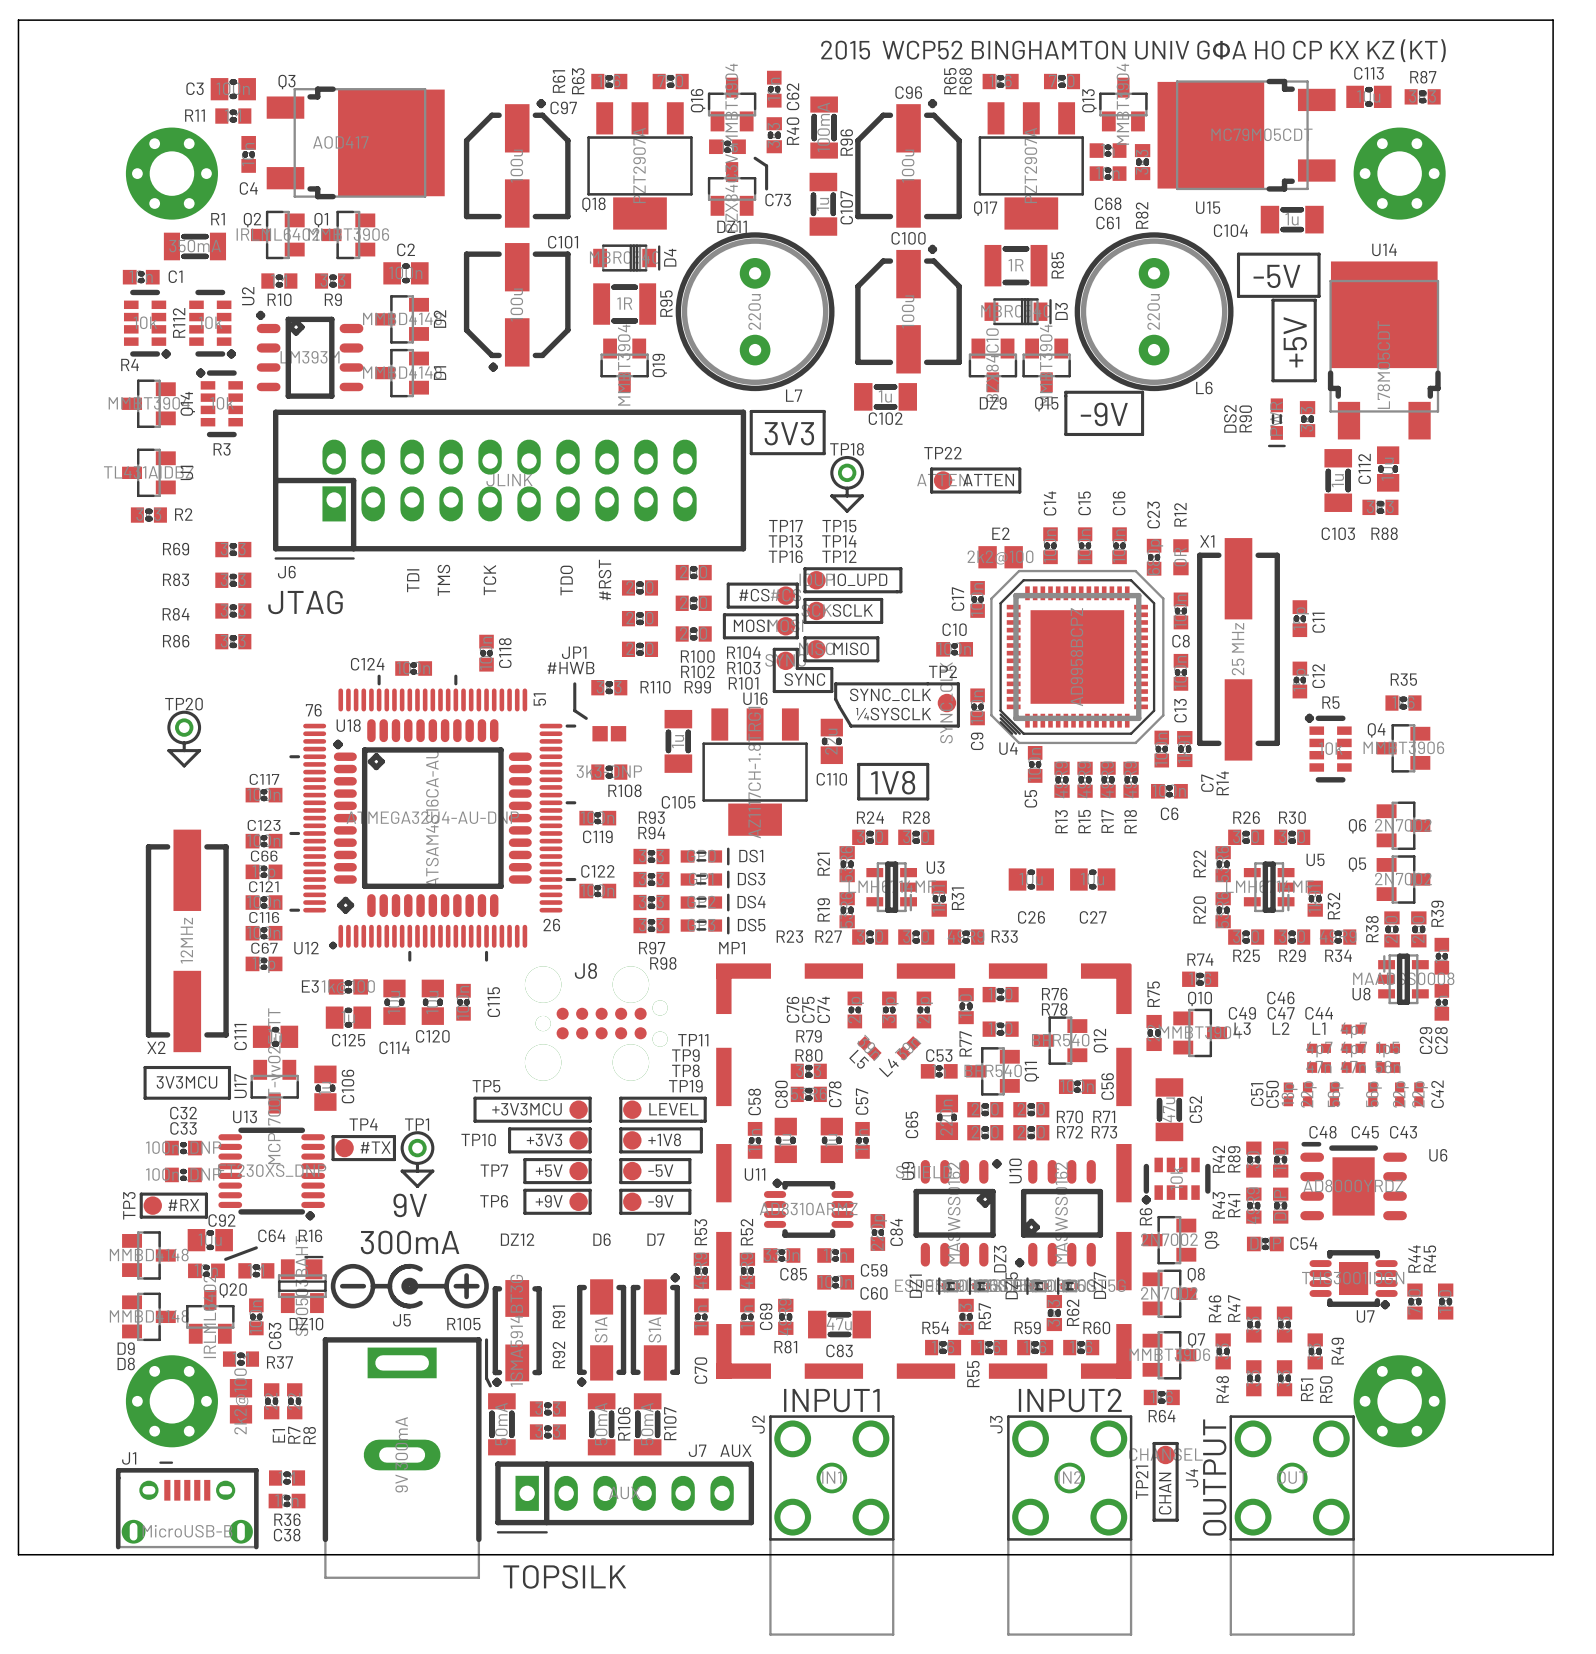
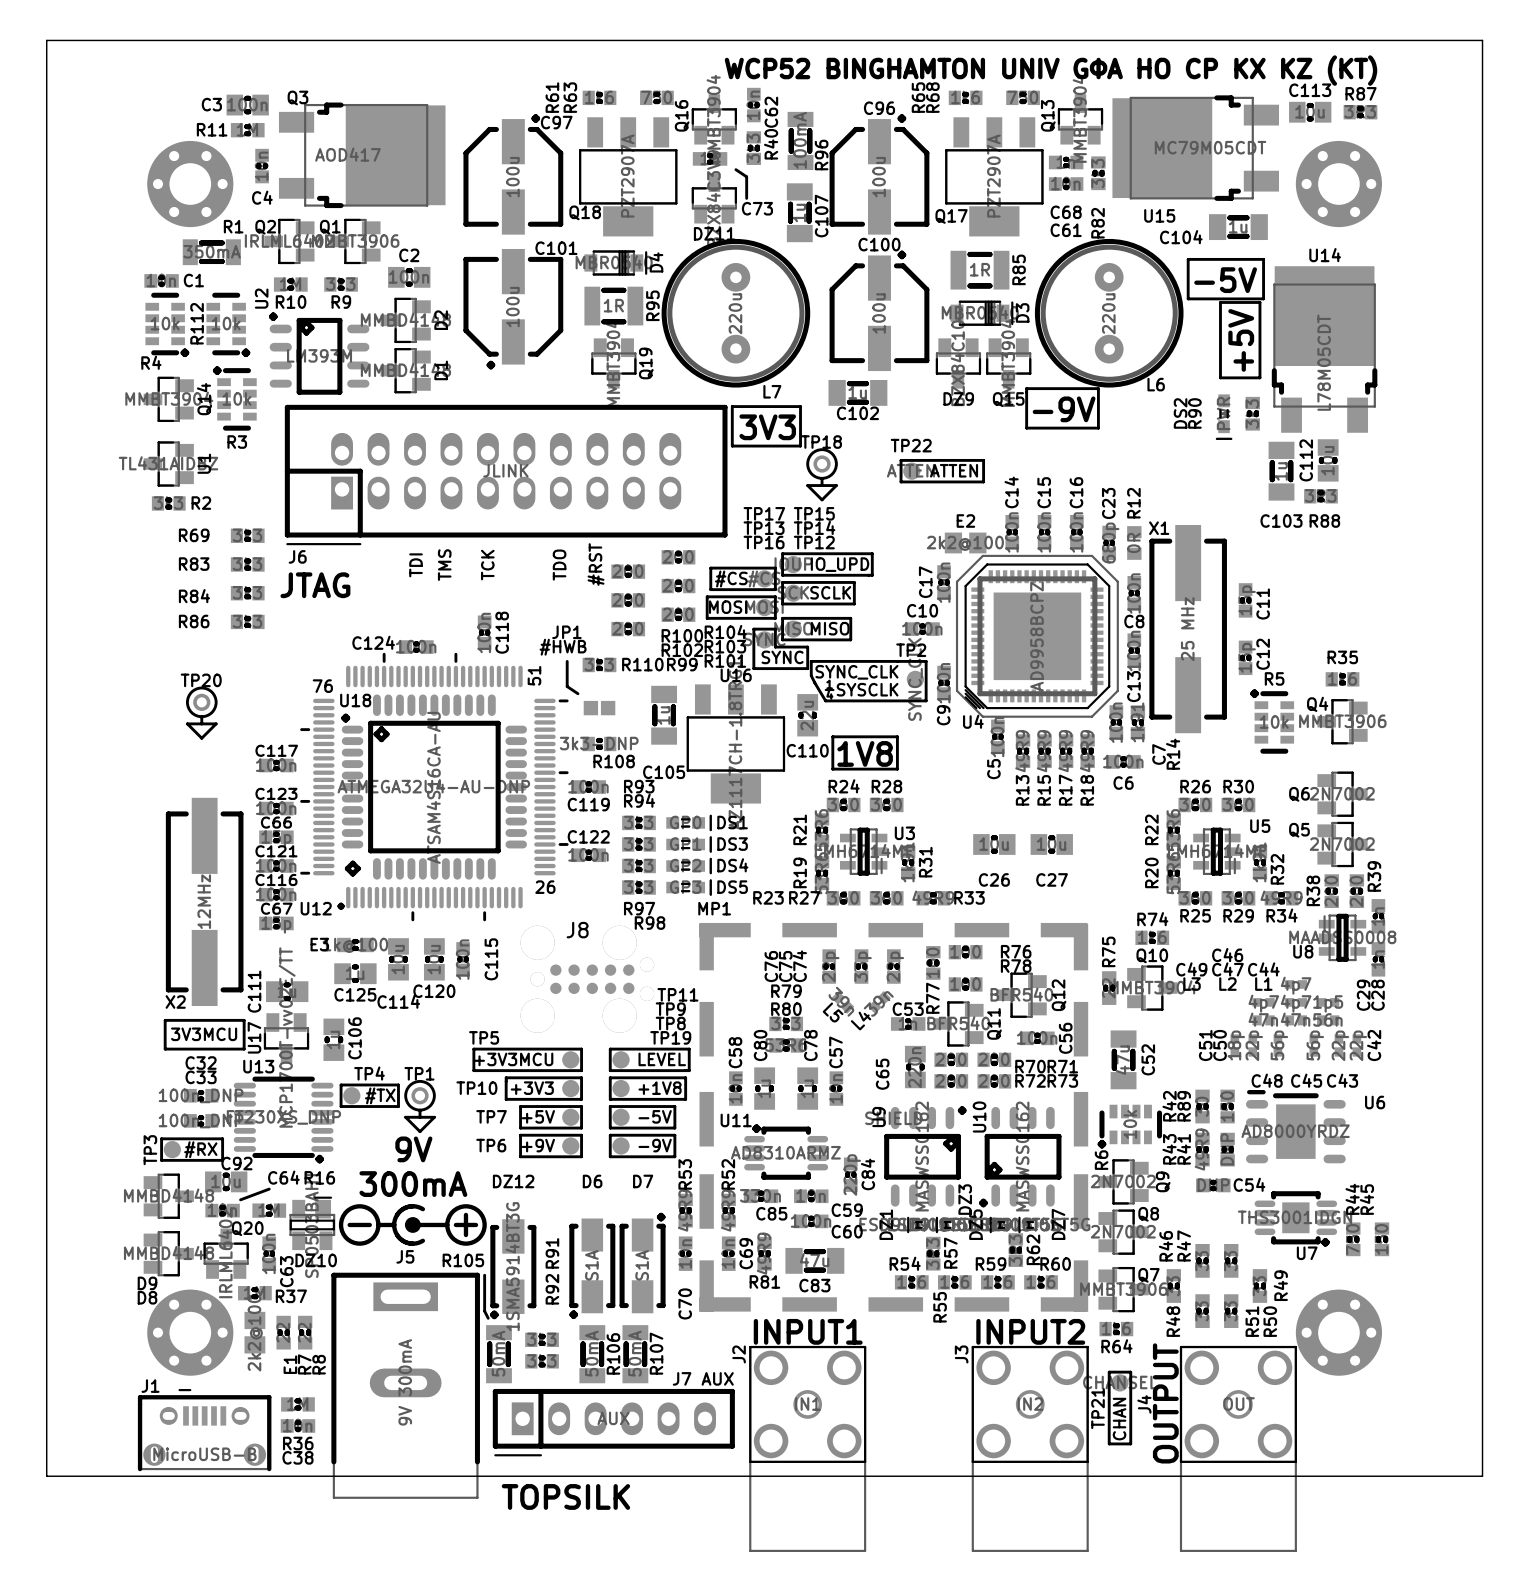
text: 2015 WCP52 BINGHAMTON UNIV GΦA HO CP KX KZ (KT) (1133, 50) -> WCP52 BINGHAMTON UNIV GΦA HO CP KX KZ (KT) (1050, 70)

